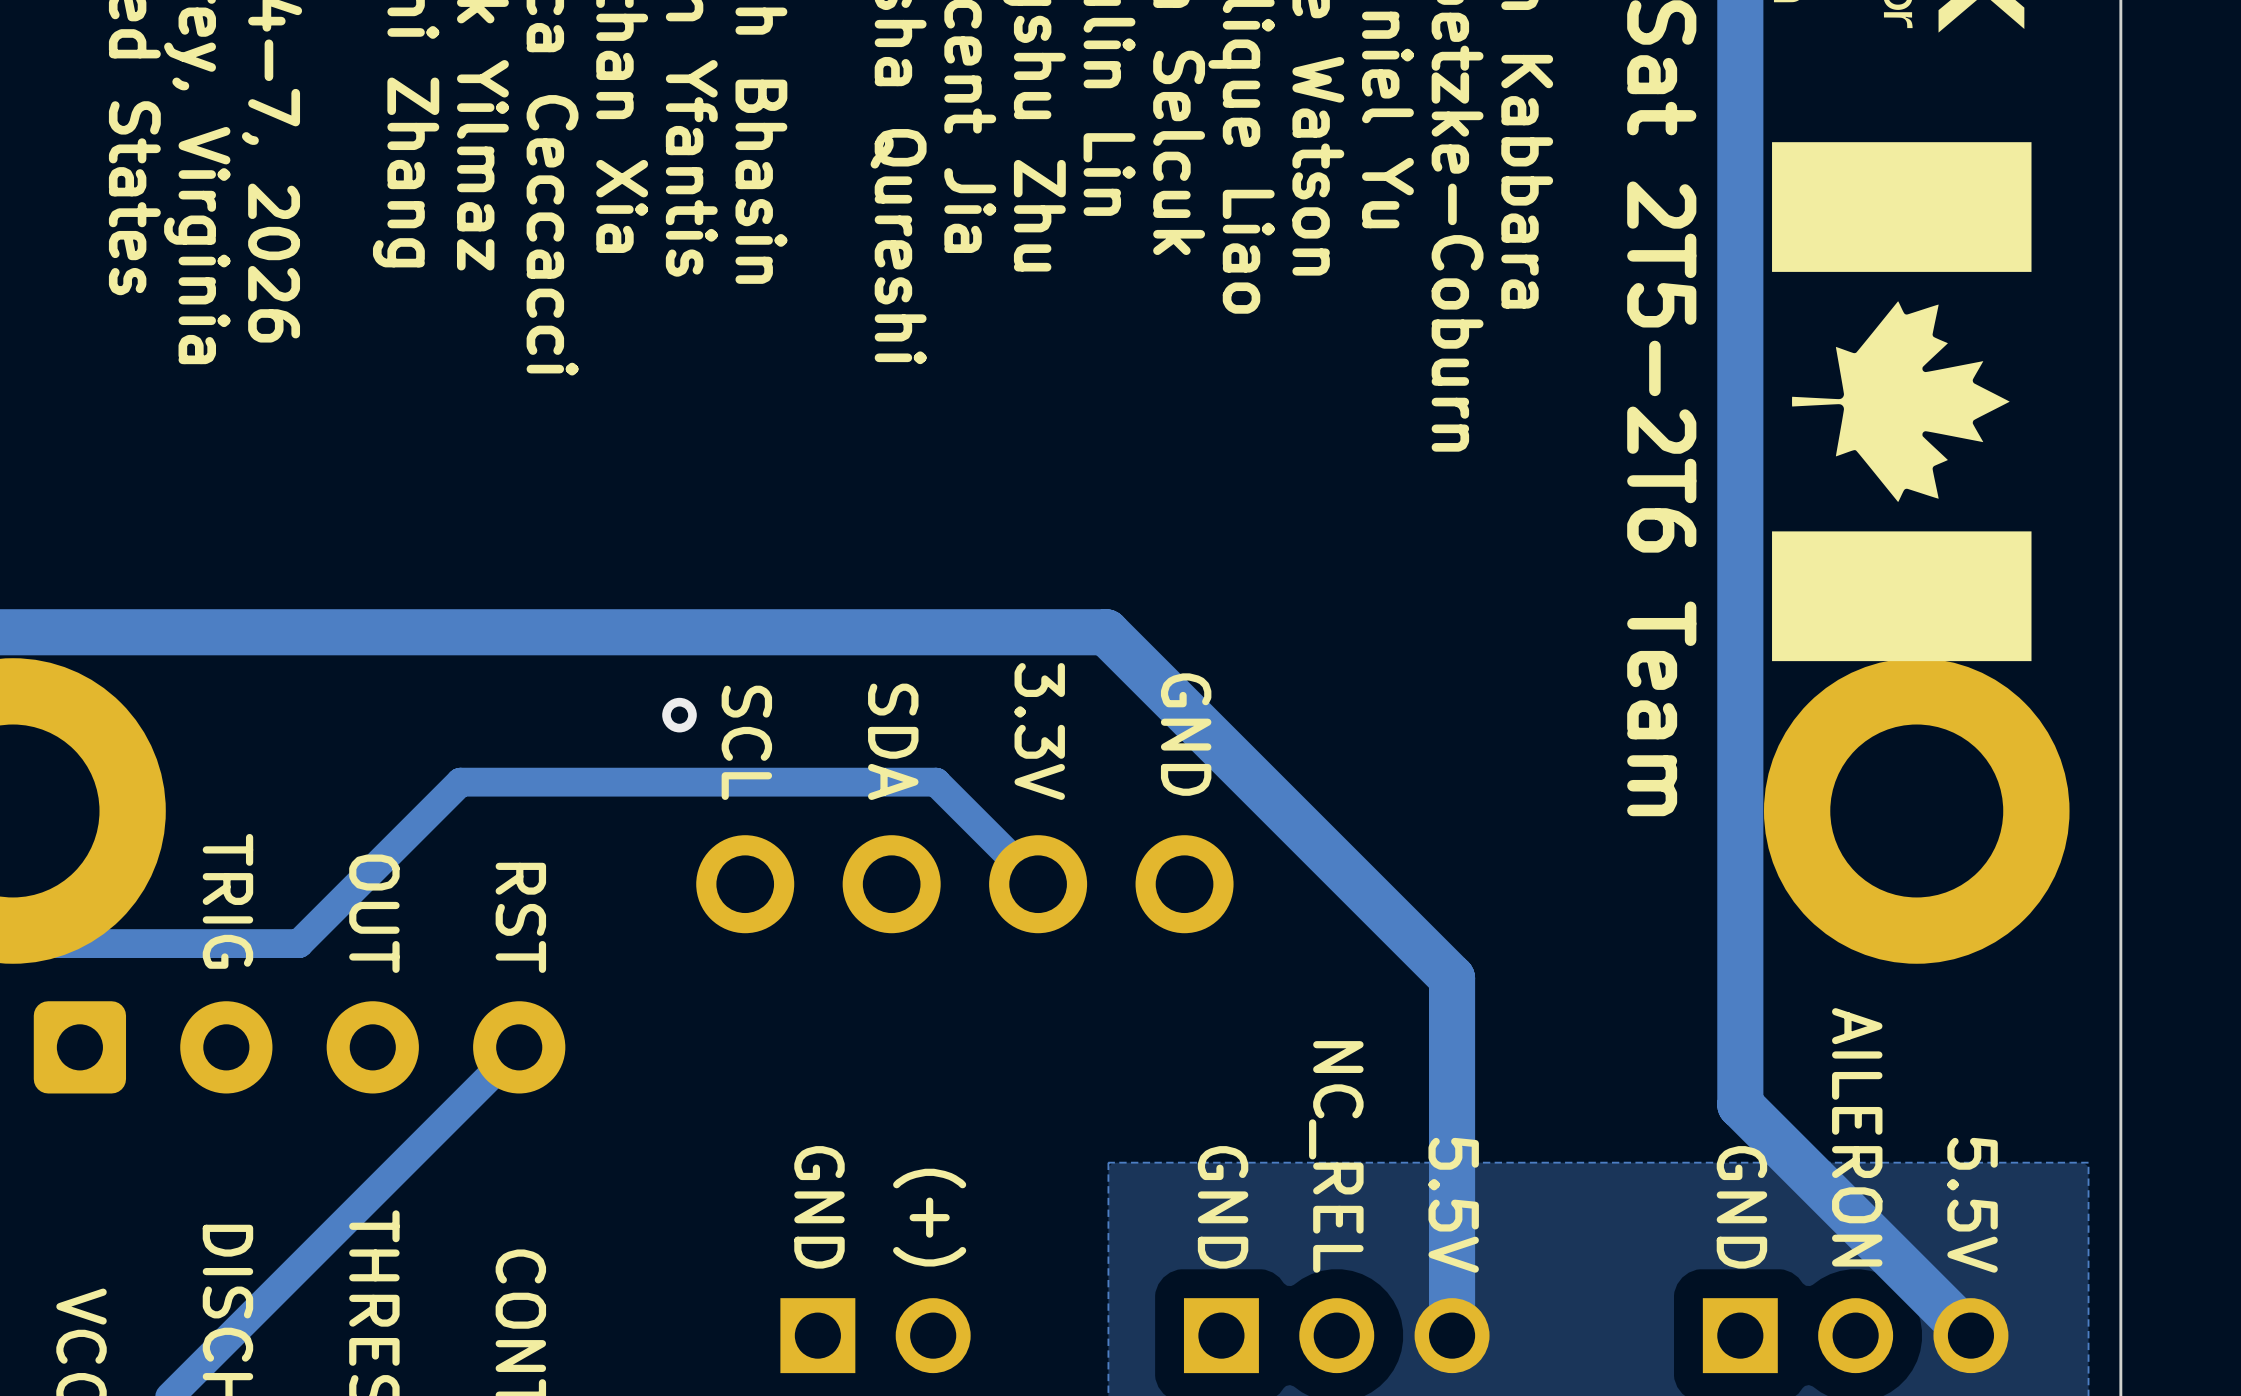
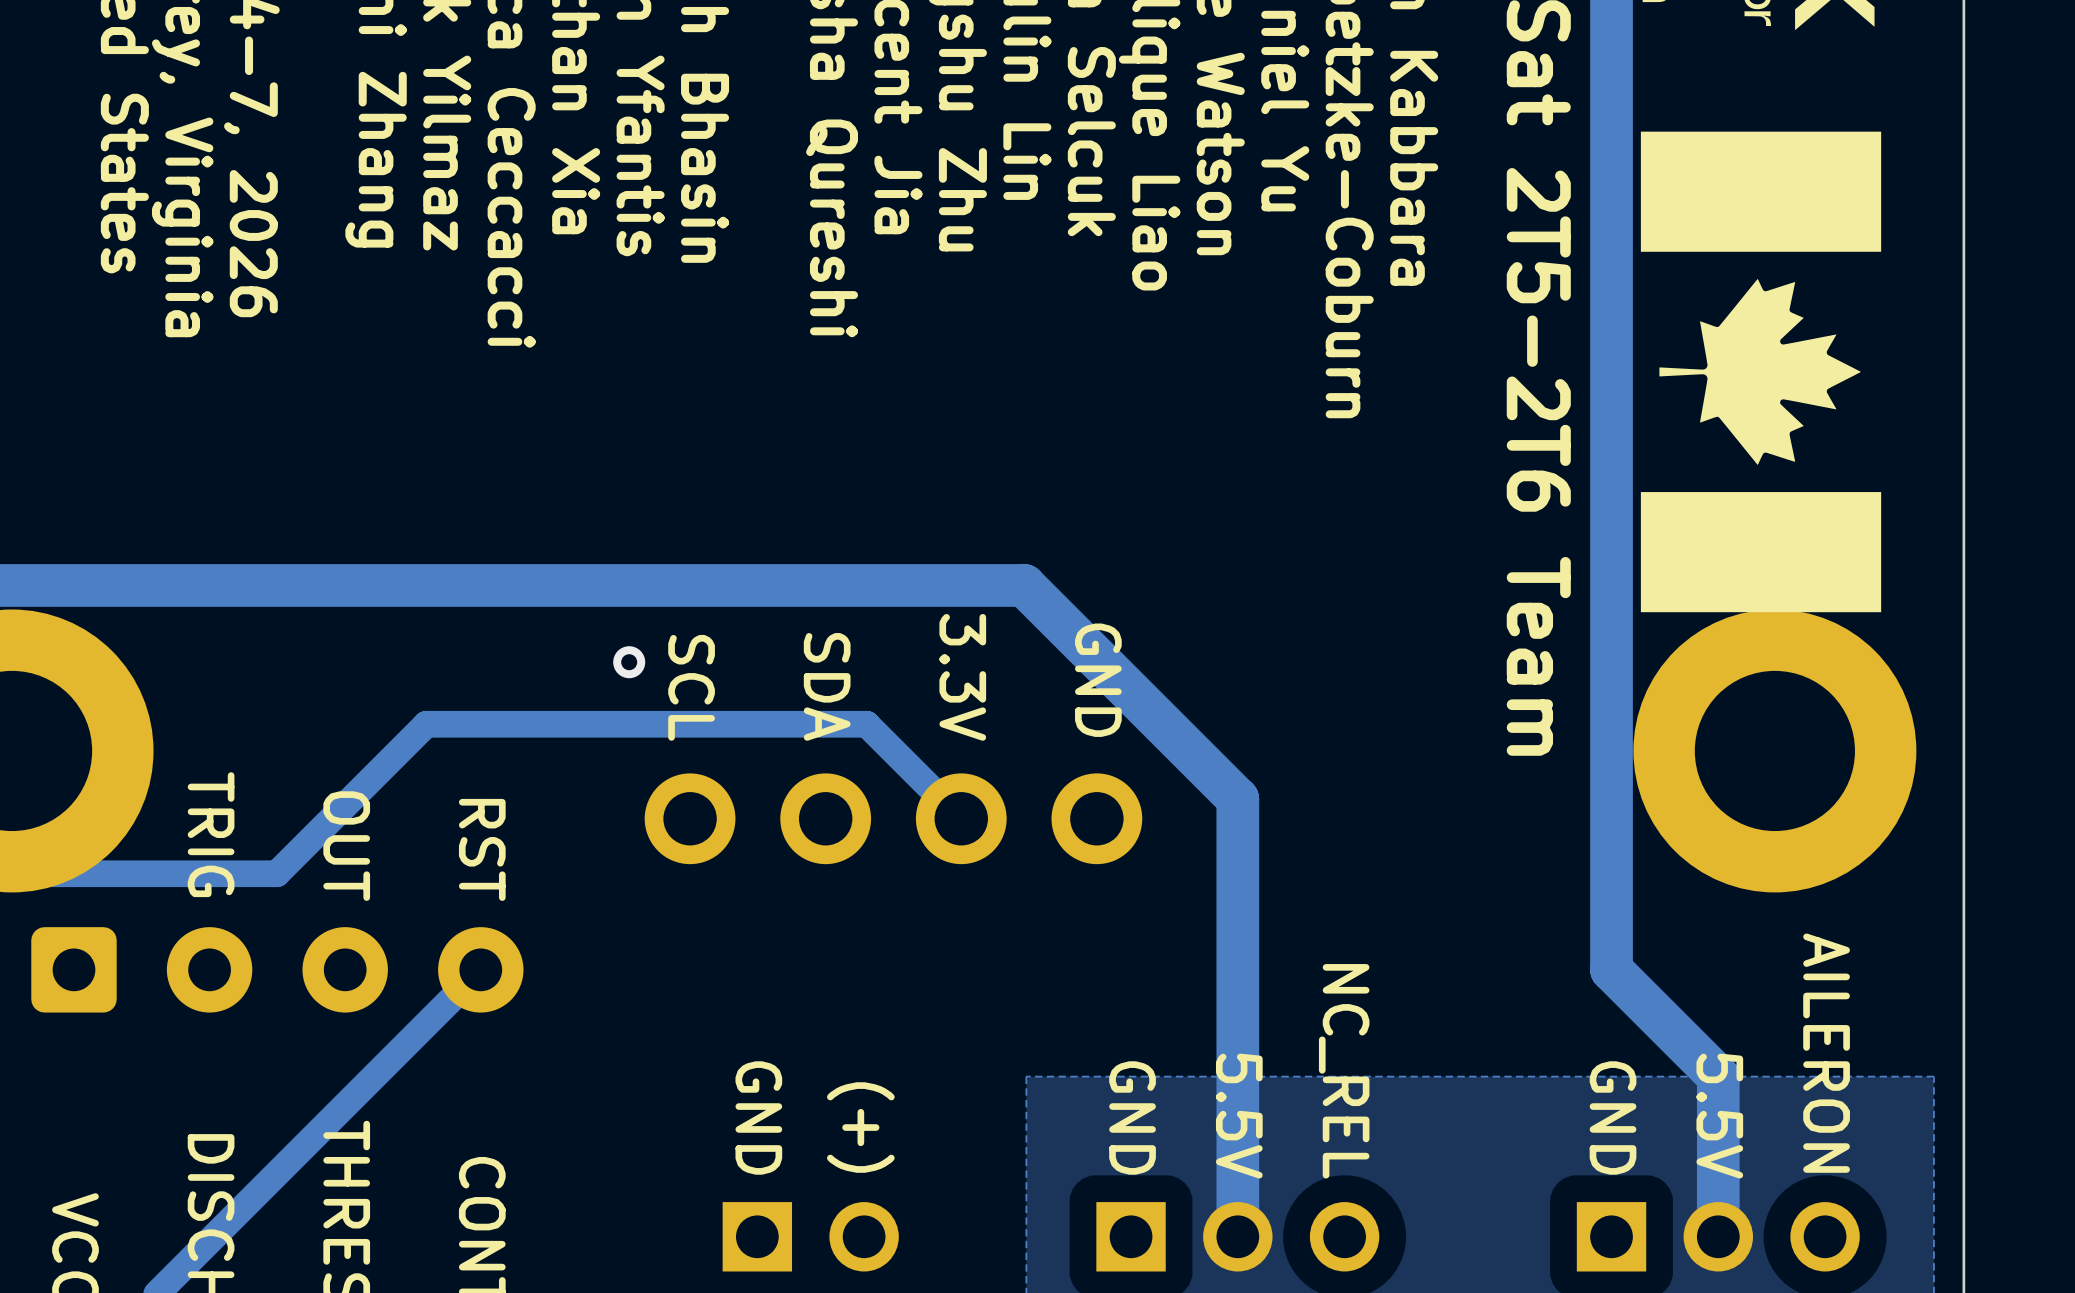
track: (1336, 862) (1452, 978) (1452, 1335) -> (1237, 799) (1237, 1236)
track: (1740, 1047) (1740, 1105) (1970, 1335) -> (1611, 969) (1718, 1076) (1718, 1236)
text: AILERON (1857, 1137) -> 5.5V (1719, 1116)
text: NC_REL (1336, 1156) -> 5.5V (1239, 1116)
text: 5.5V (1453, 1205) -> NC_REL (1344, 1071)
text: 5.5V (1972, 1205) -> AILERON (1826, 1053)

